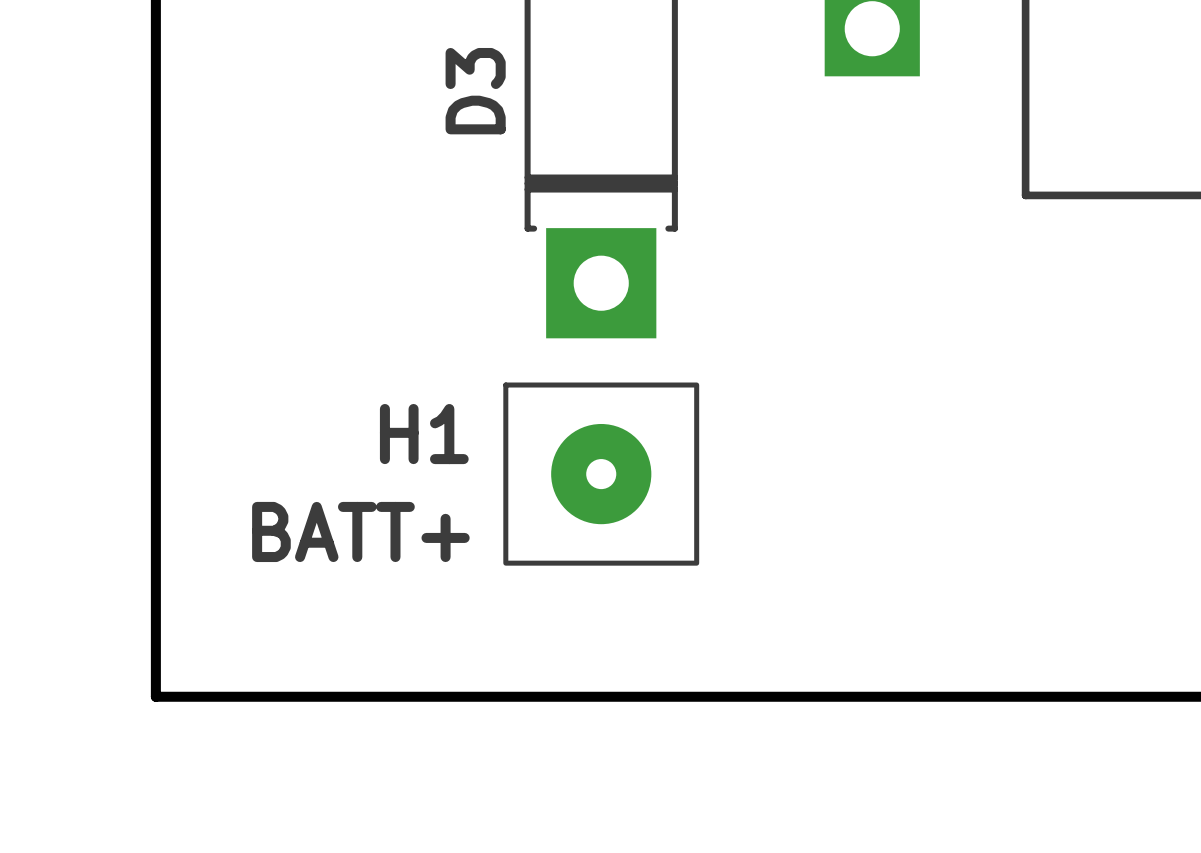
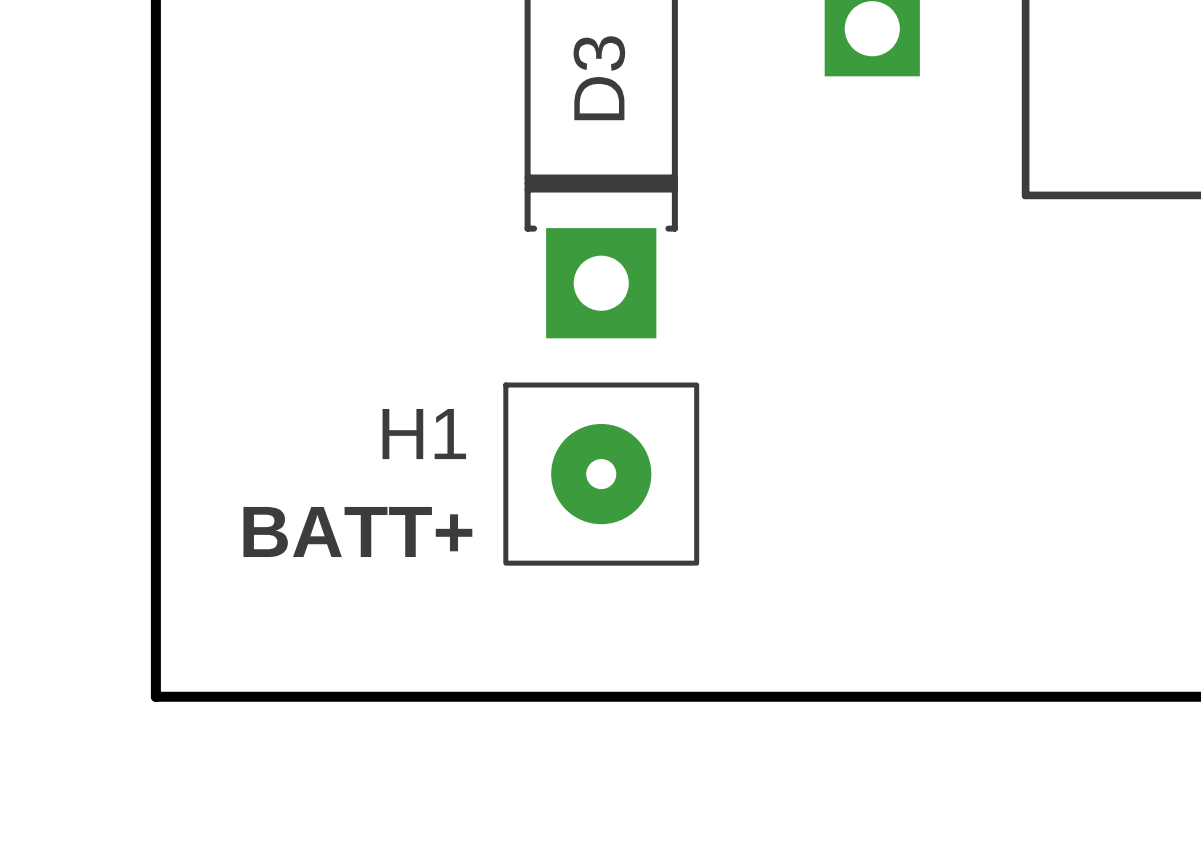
D3 name position: D3 (475, 91) -> D3 (599, 78)

